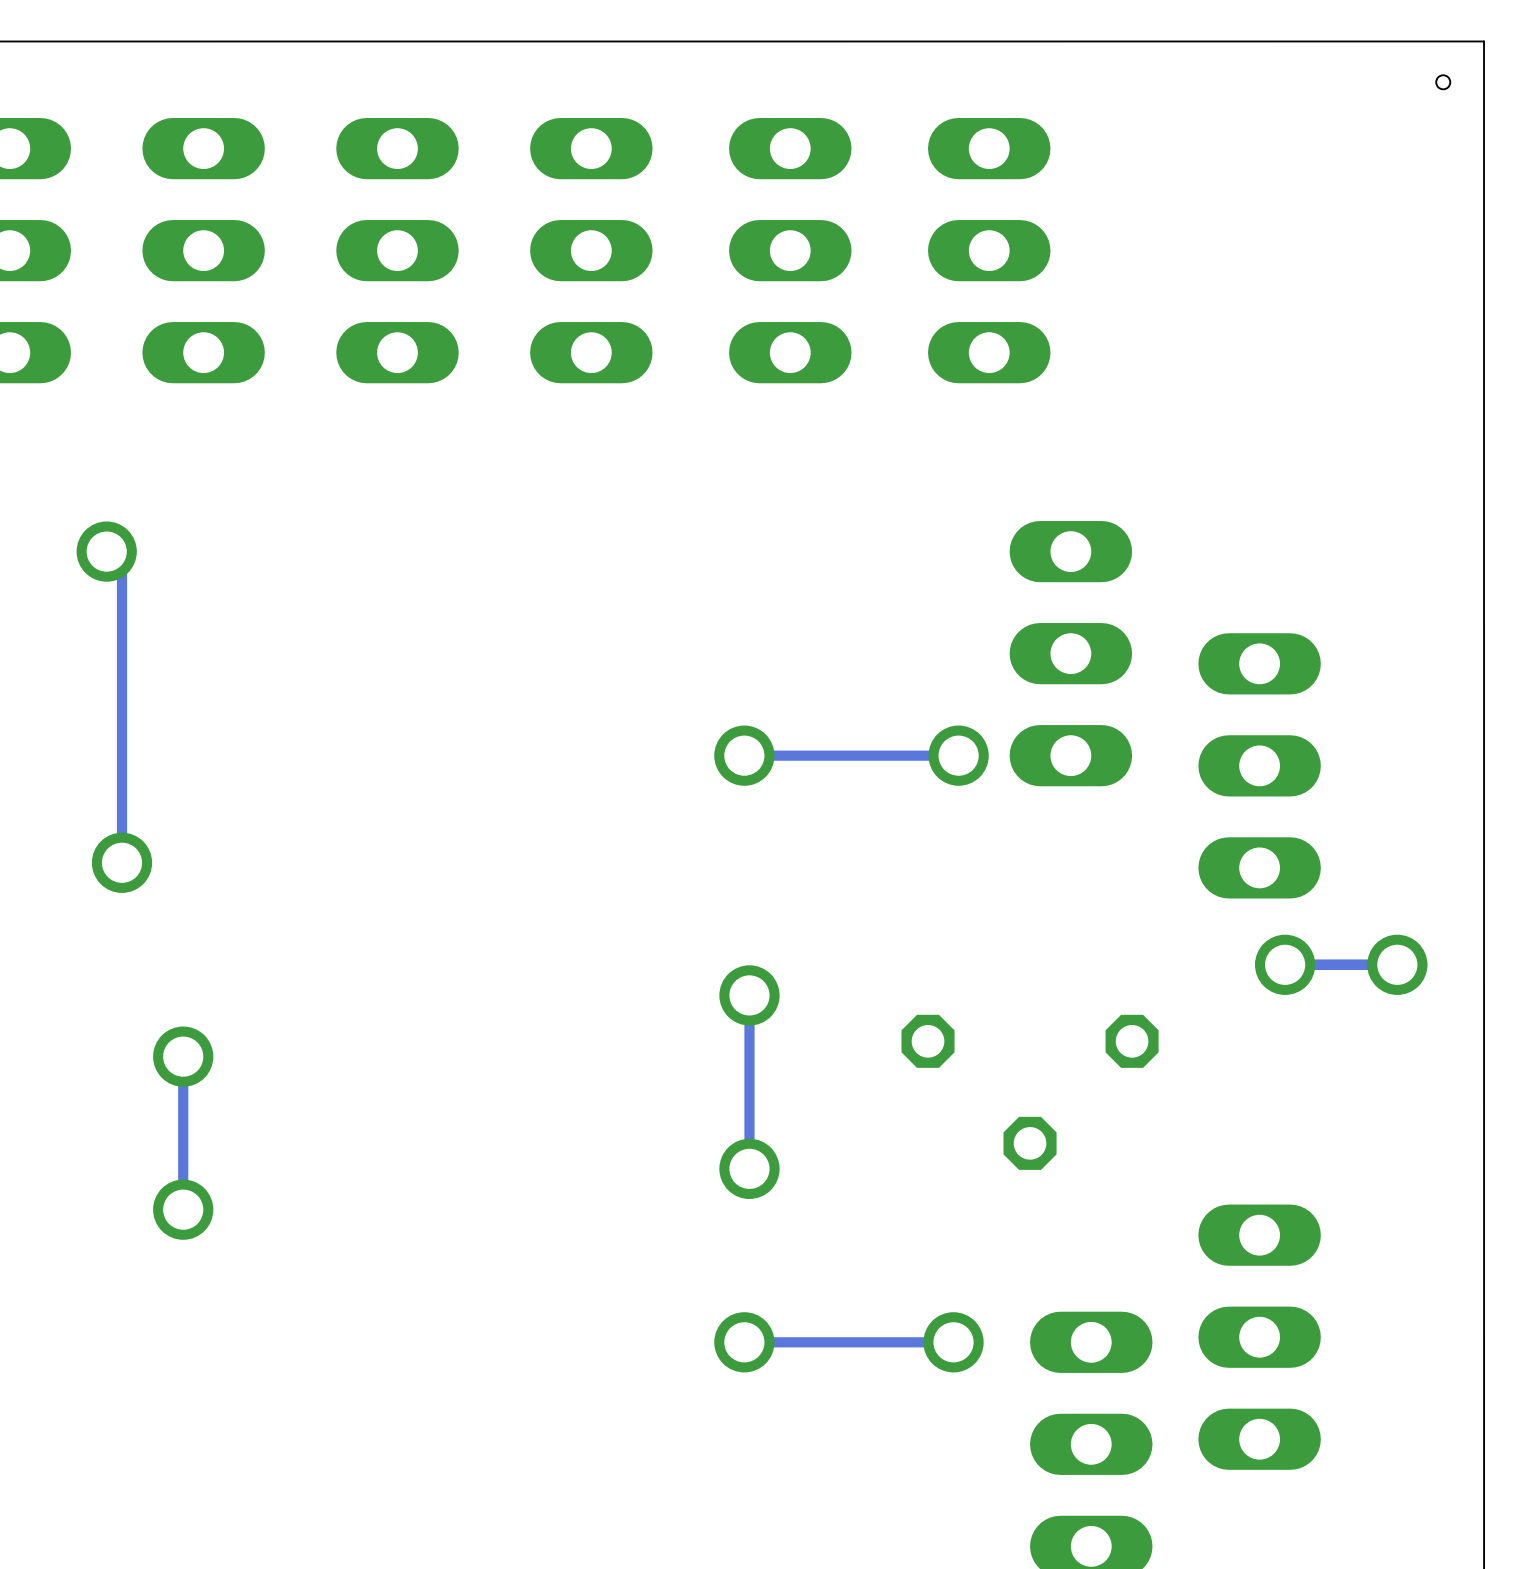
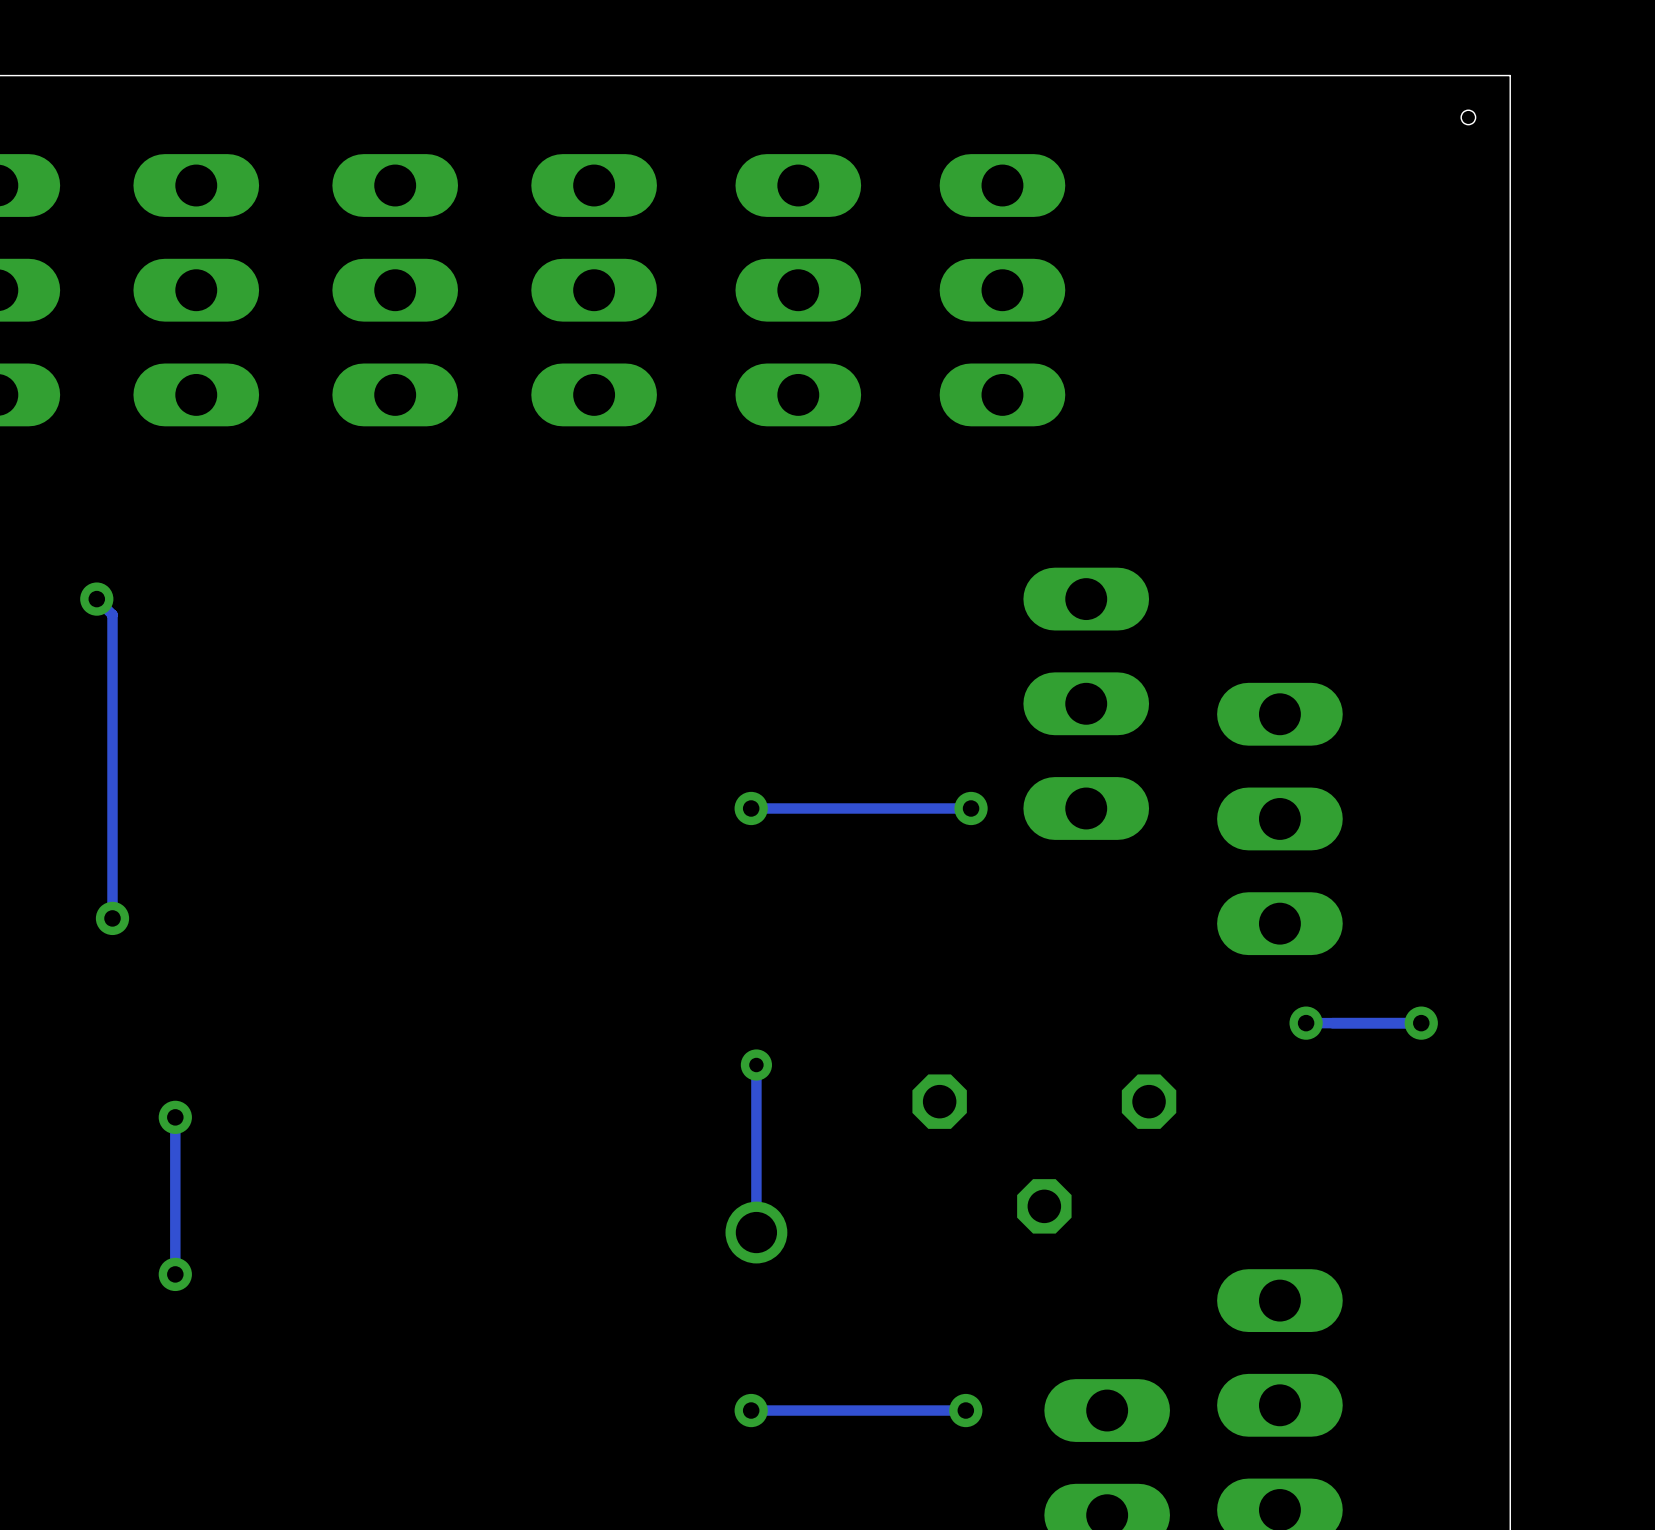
via size: [76, 521, 137, 582] -> [80, 582, 114, 616]
via size: [714, 725, 775, 786] -> [734, 791, 768, 826]
via size: [928, 725, 989, 786] -> [954, 791, 988, 826]
via size: [91, 832, 153, 893] -> [95, 901, 130, 936]
via size: [1254, 934, 1316, 995] -> [1289, 1006, 1323, 1040]
via size: [1367, 934, 1428, 995] -> [1404, 1006, 1438, 1040]
via: (749, 995) -> none
via size: [153, 1026, 214, 1087] -> [158, 1100, 192, 1134]
via size: [153, 1179, 214, 1240] -> [158, 1257, 192, 1292]
via size: [714, 1312, 775, 1373] -> [734, 1393, 768, 1428]
via size: [923, 1312, 984, 1373] -> [949, 1393, 983, 1428]

